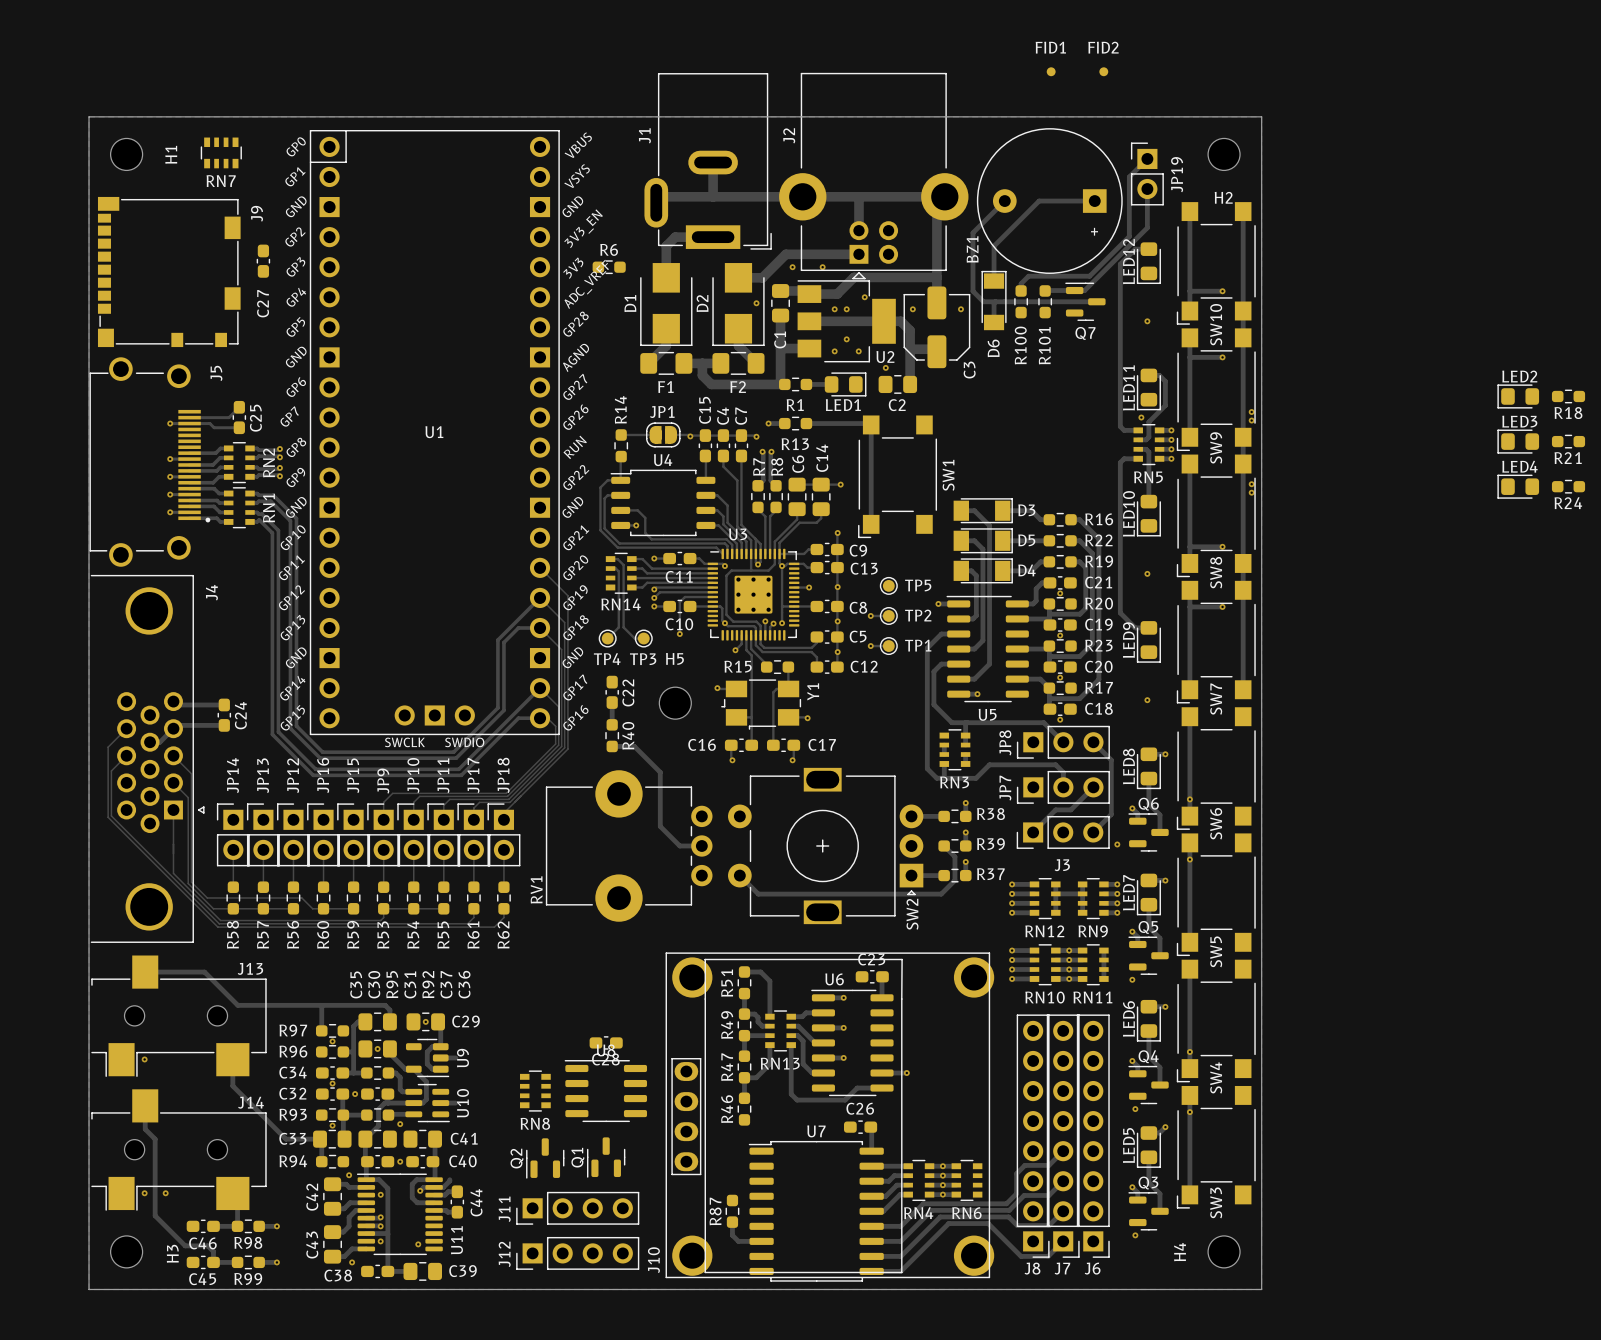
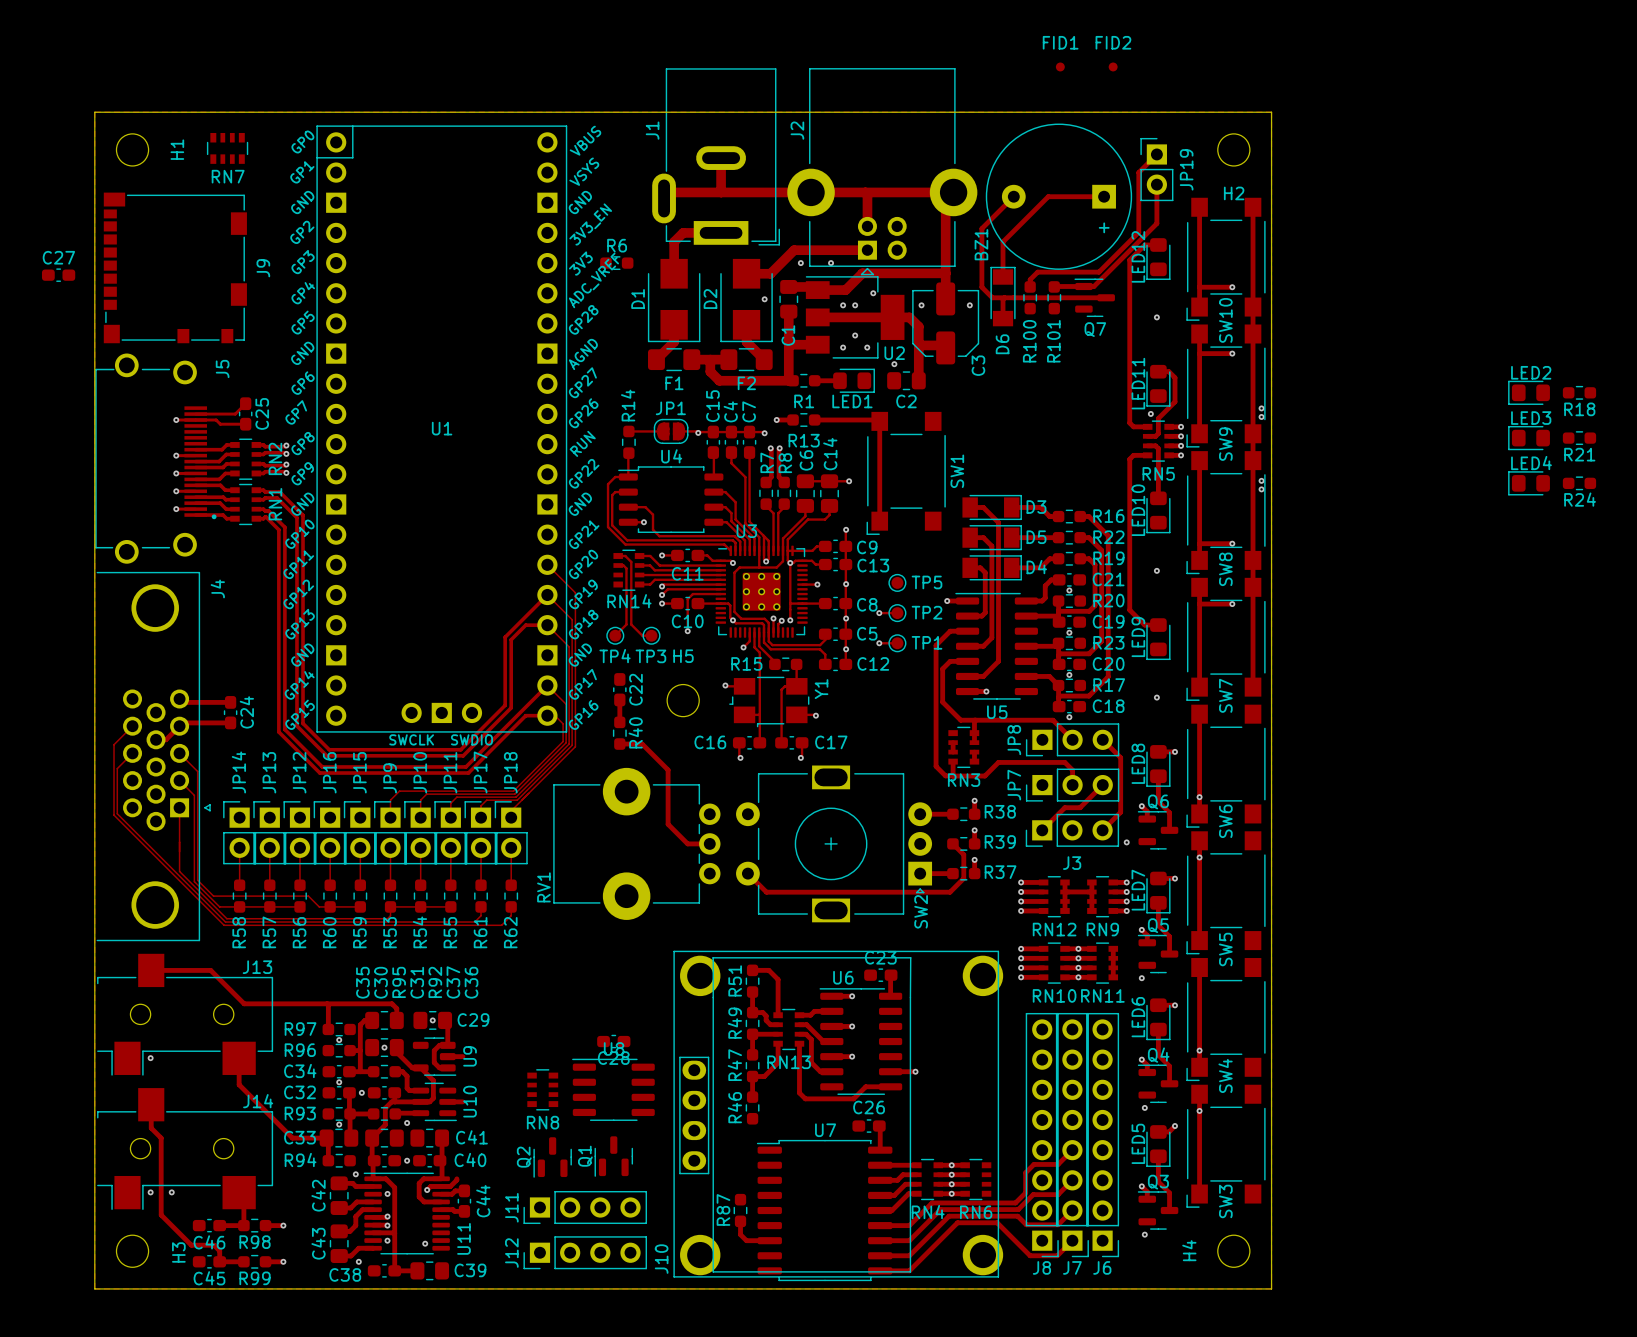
J9 name position: J9 (257, 213) -> J9 (263, 268)
C27 rotation: 0° (263, 261) -> 90° clockwise (58, 275)
C27 position: (263, 261) -> (58, 275)
C27 name position: C27 (263, 303) -> C27 (58, 257)

